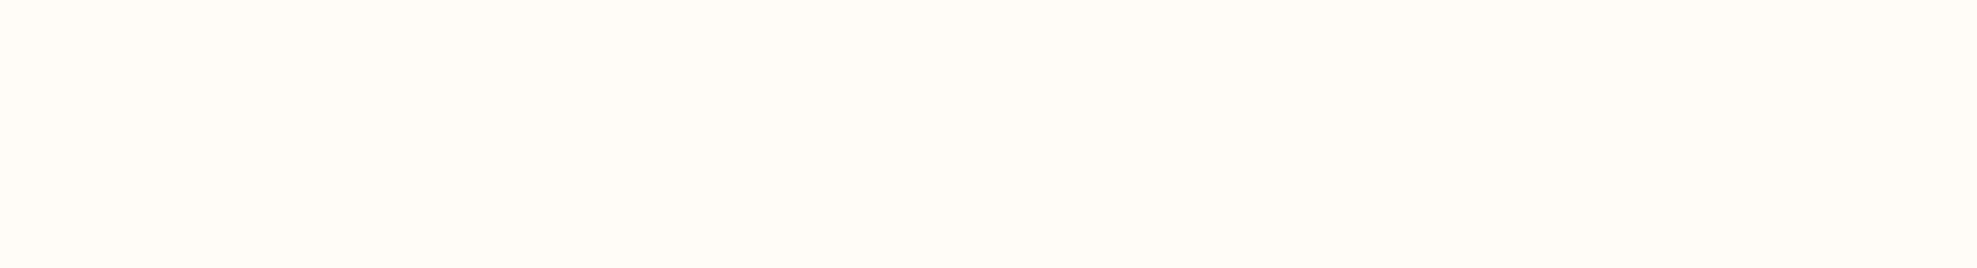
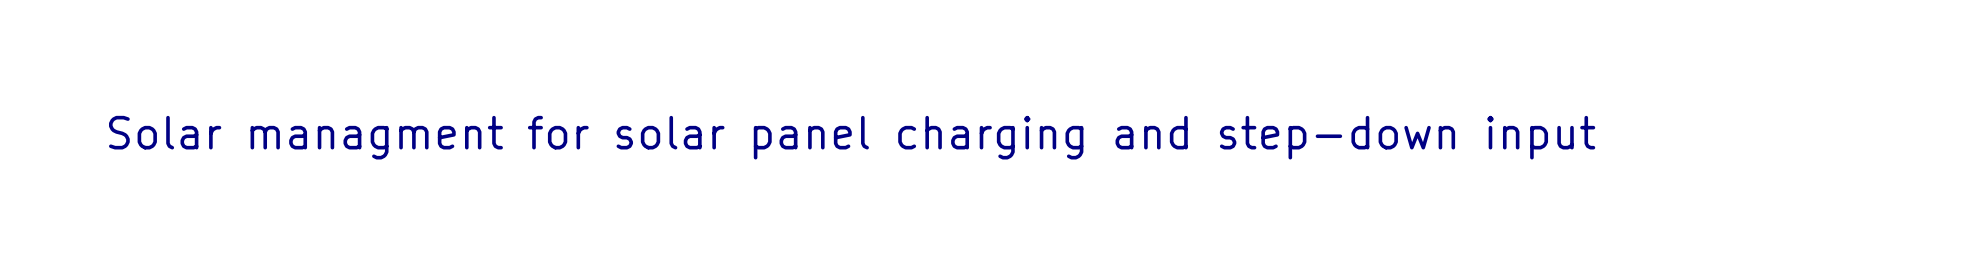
text: none -> Solar managment for solar panel charging and step-down input (852, 137)

